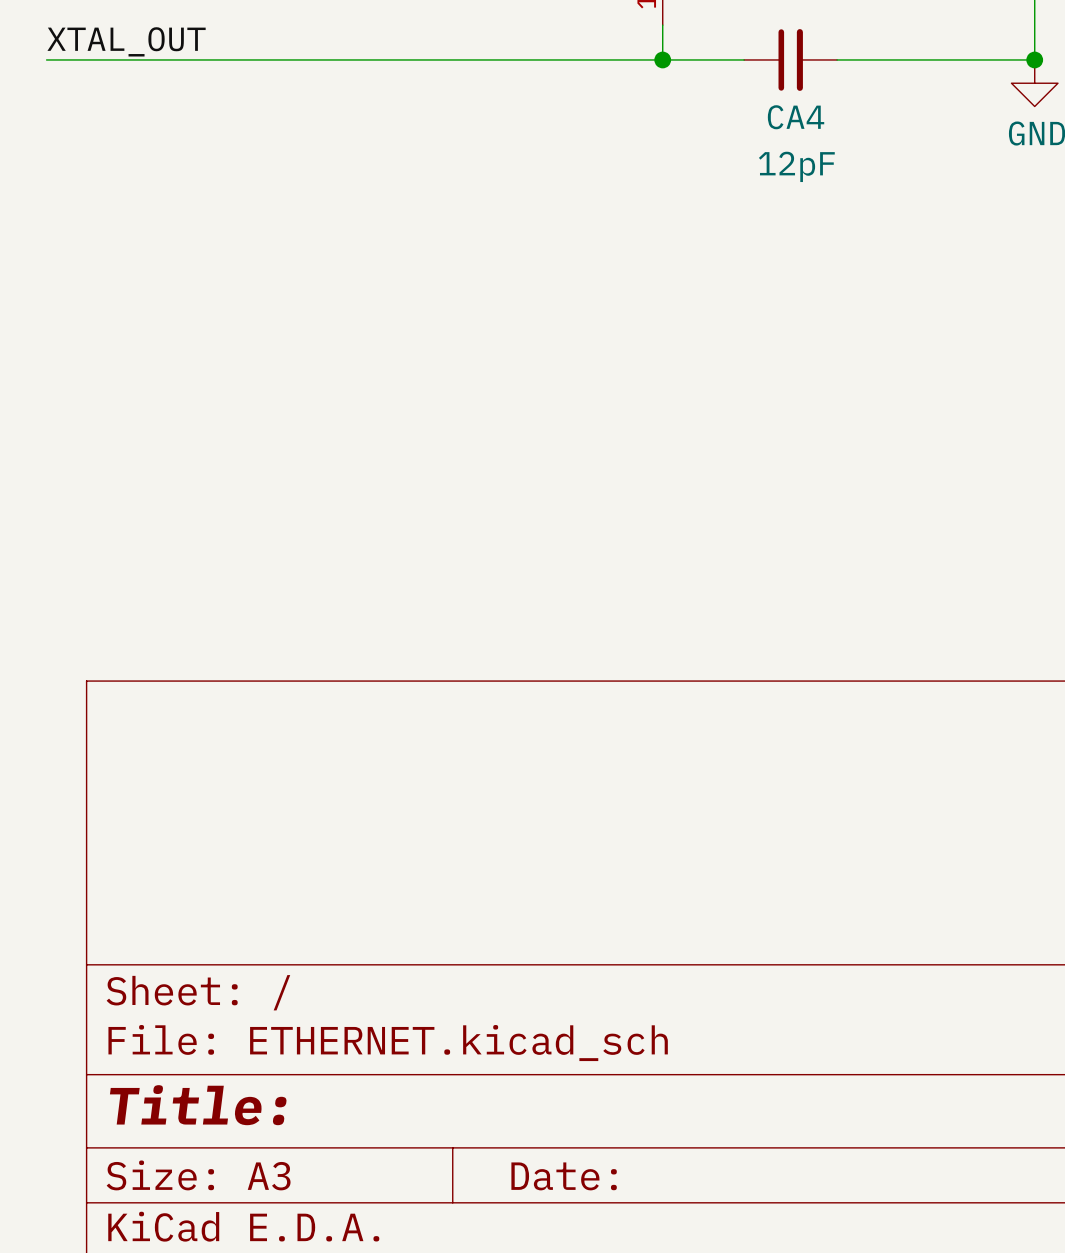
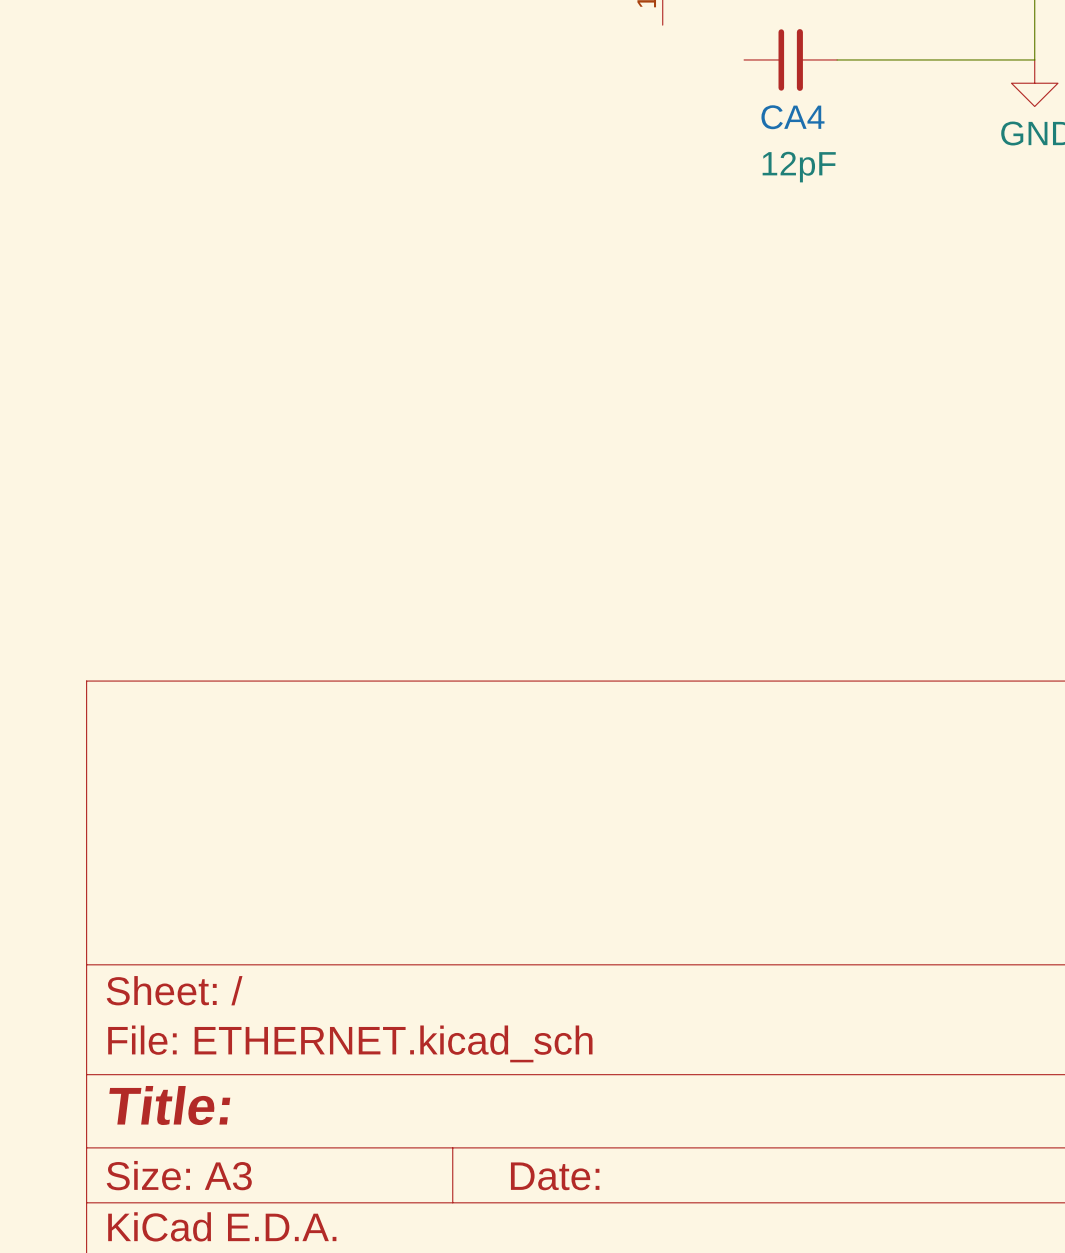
wire: (662, 25) (662, 59) -> none
label: XTAL_OUT (126, 41) -> none
wire: (46, 59) (744, 59) -> none
junction: (662, 59) -> none
junction: (1034, 59) -> none

